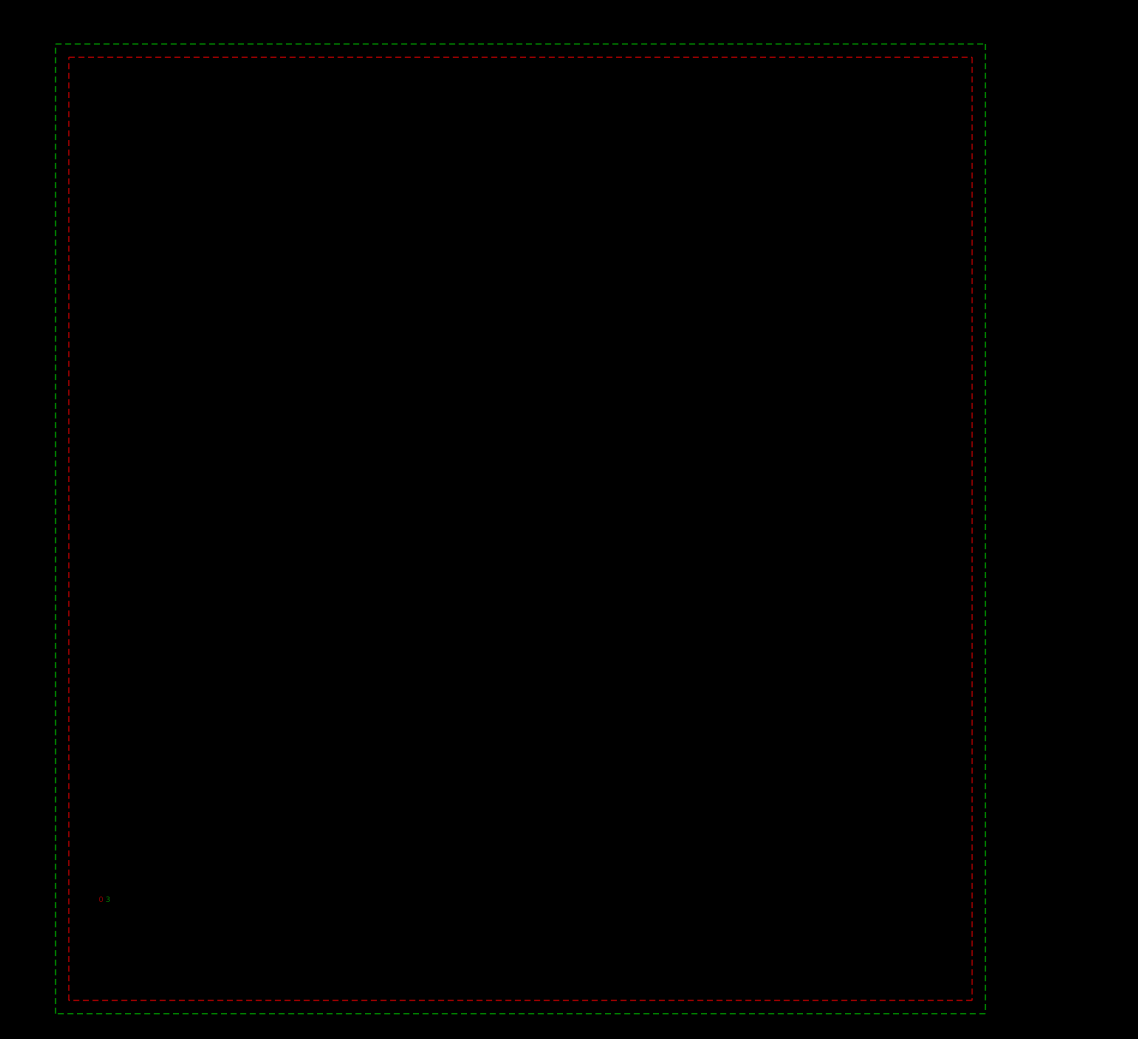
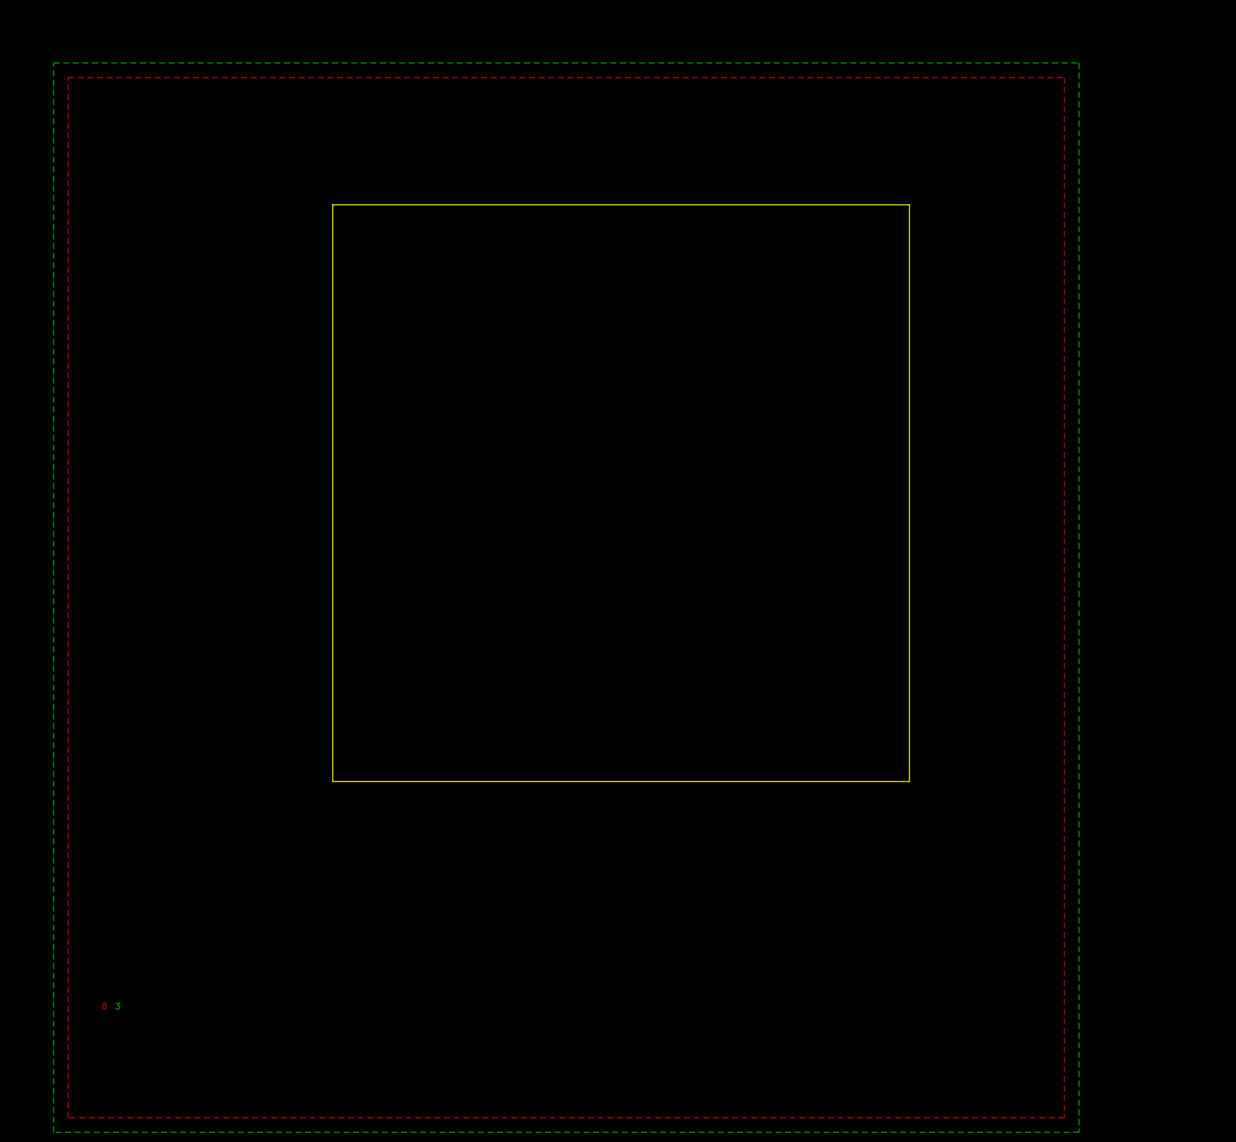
board edge: none -> (332, 204) (909, 204) (909, 781) (332, 781) (332, 204)

